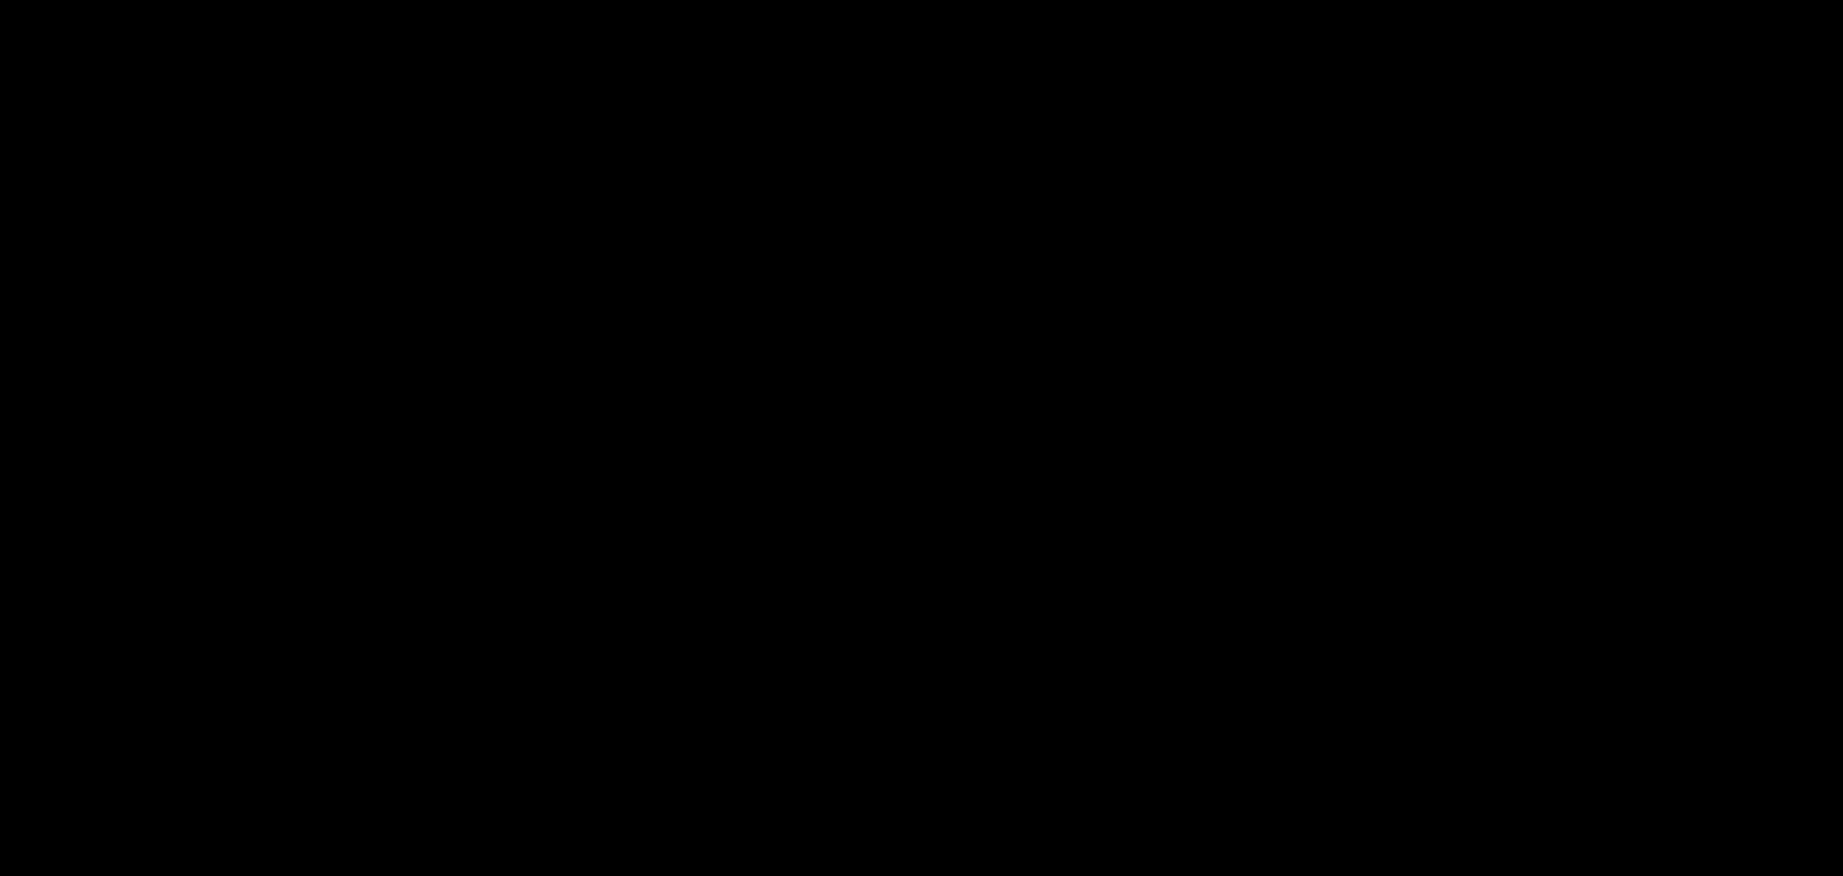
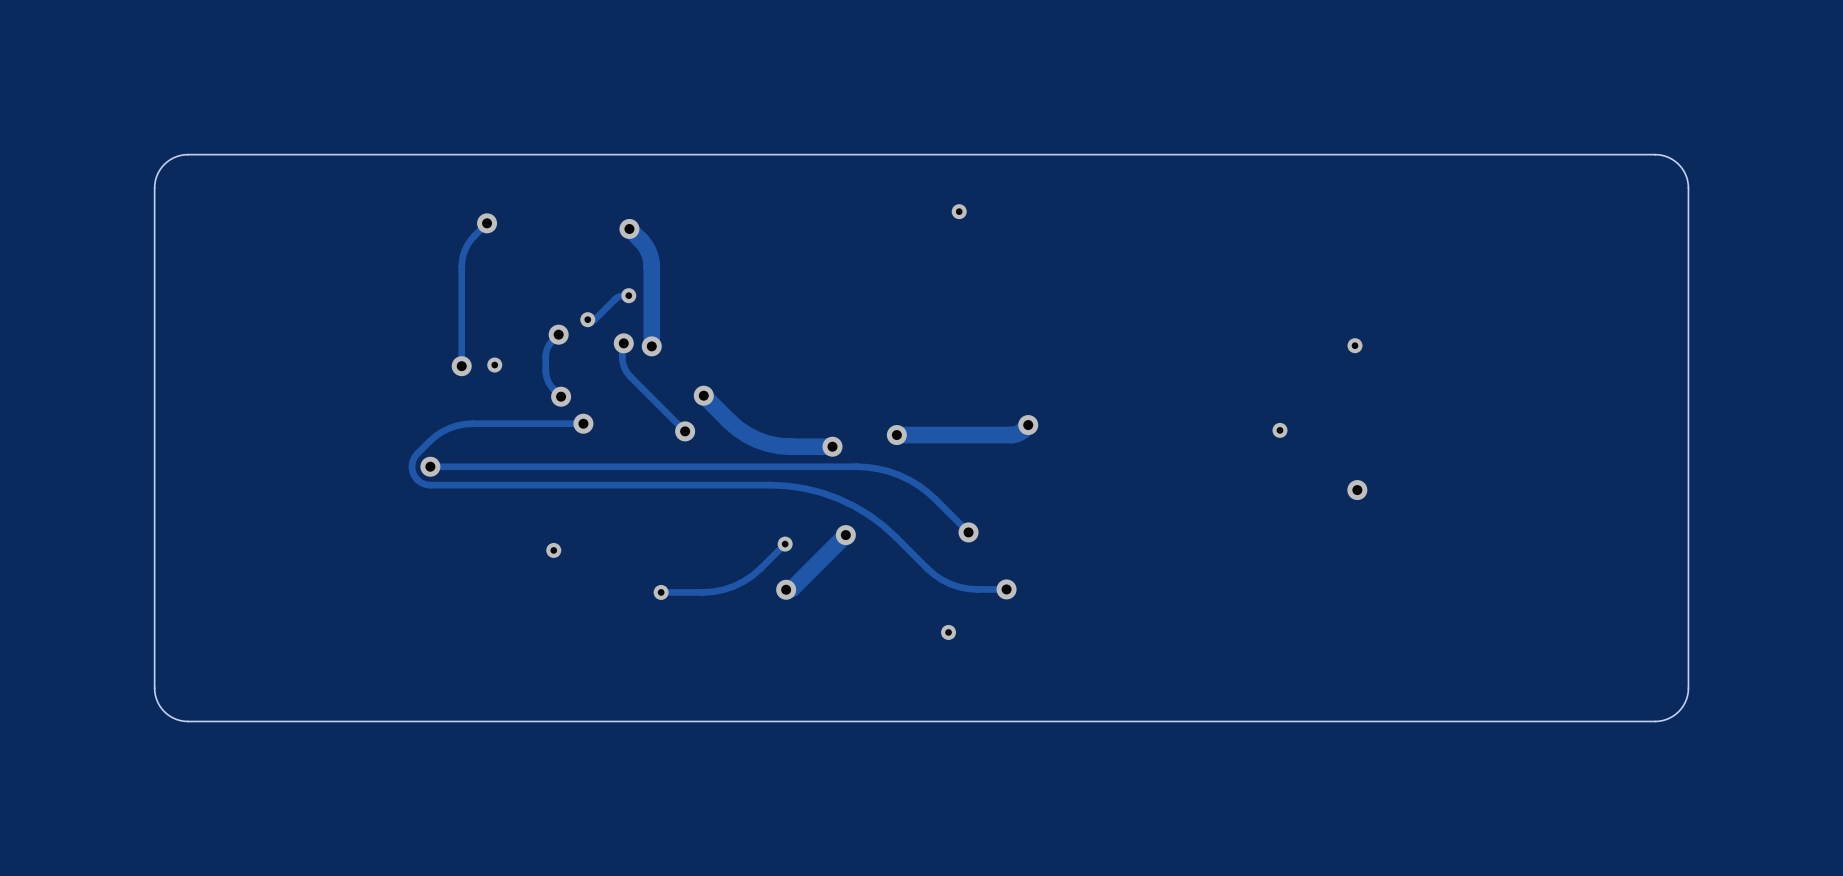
board edge: none -> (1655, 154) (187, 154) (176, 156) (161, 167) (156, 176) (154, 187) (154, 688) (156, 699) (167, 714) (176, 719) (187, 721) (1655, 721) (1666, 719) (1675, 714) (1683, 705) (1688, 688) (1688, 187) (1685, 173) (1678, 164) (1669, 157) (1655, 154)
via: none -> (959, 211)
track: none -> (487, 223) (467, 244) (462, 260) (461, 366)
via: none -> (487, 223)
track: none -> (629, 228) (645, 245) (651, 259) (651, 346)
via: none -> (629, 228)
track: none -> (628, 295) (618, 297) (594, 319) (587, 319)
via: none -> (628, 295)
via: none -> (587, 319)
track: none -> (558, 334) (547, 348) (545, 370) (549, 383) (561, 396)
via: none -> (558, 334)
track: none -> (623, 343) (622, 360) (628, 373) (685, 431)
via: none -> (623, 343)
via: none -> (1355, 345)
via: none -> (651, 346)
via: none -> (494, 365)
via: none -> (461, 366)
track: none -> (703, 395) (737, 428) (757, 440) (779, 445) (832, 446)
via: none -> (703, 395)
via: none -> (561, 396)
track: none -> (583, 423) (472, 423) (456, 425) (435, 436) (417, 453) (412, 461) (412, 471) (419, 481) (430, 485) (770, 485) (804, 488) (838, 498) (869, 515) (883, 525) (927, 568) (942, 580) (968, 588) (1006, 589)
via: none -> (583, 423)
track: none -> (1028, 425) (1019, 432) (1013, 434) (896, 435)
via: none -> (1028, 425)
via: none -> (1279, 430)
via: none -> (685, 431)
via: none -> (896, 435)
via: none -> (832, 446)
track: none -> (430, 466) (867, 467) (888, 471) (918, 485) (968, 532)
via: none -> (430, 466)
via: none -> (1357, 490)
via: none -> (968, 532)
track: none -> (845, 535) (792, 588) (786, 589)
via: none -> (845, 535)
track: none -> (785, 544) (752, 575) (734, 586) (713, 591) (661, 592) (661, 595)
via: none -> (785, 544)
via: none -> (553, 550)
via: none -> (786, 589)
via: none -> (1006, 589)
via: none -> (661, 592)
via: none -> (948, 632)

